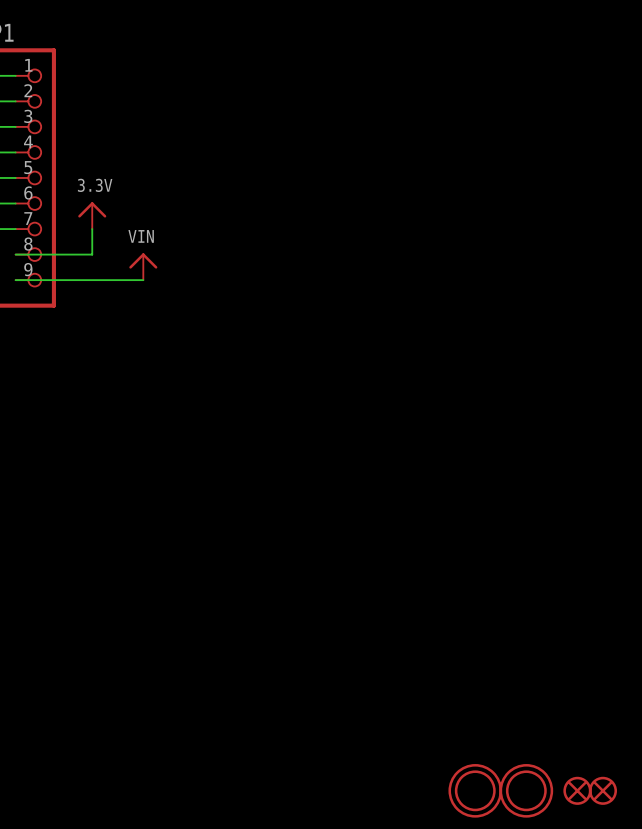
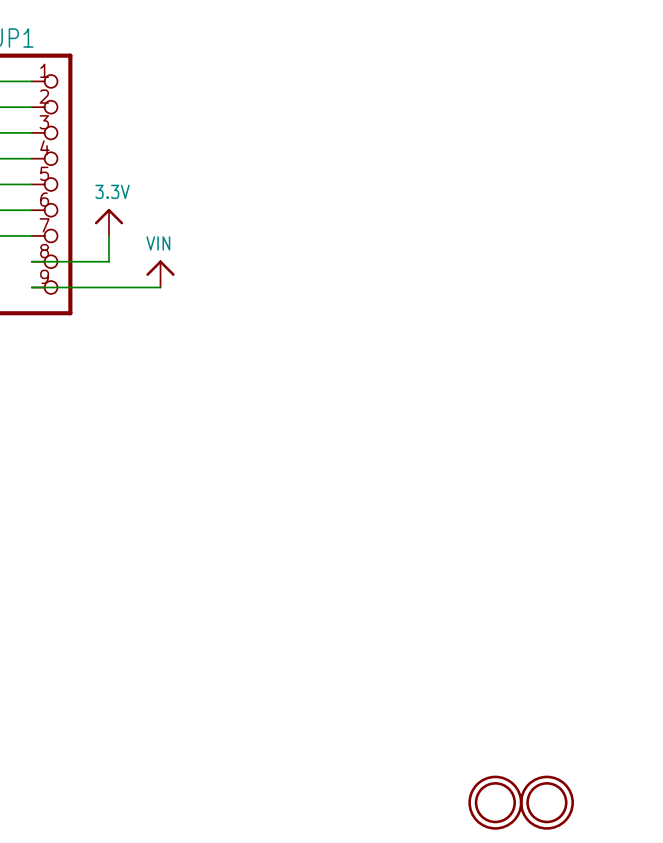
part: (577, 790) -> none
part: (602, 790) -> none

